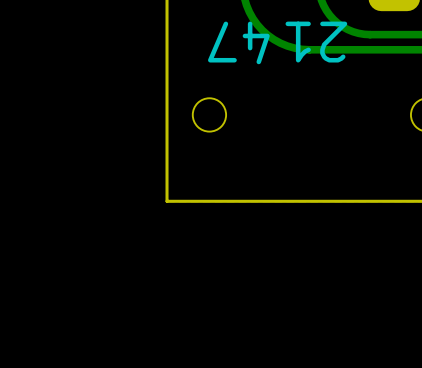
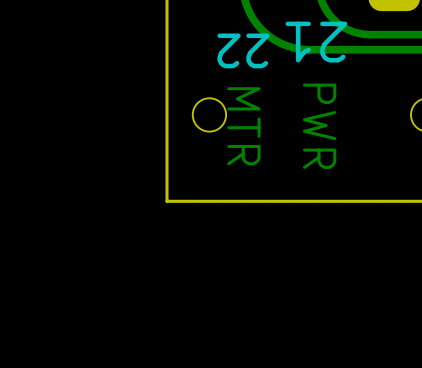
text: 47 (238, 42) -> 22 (243, 50)
text: none -> MTR (243, 126)
text: none -> PWR (319, 126)

